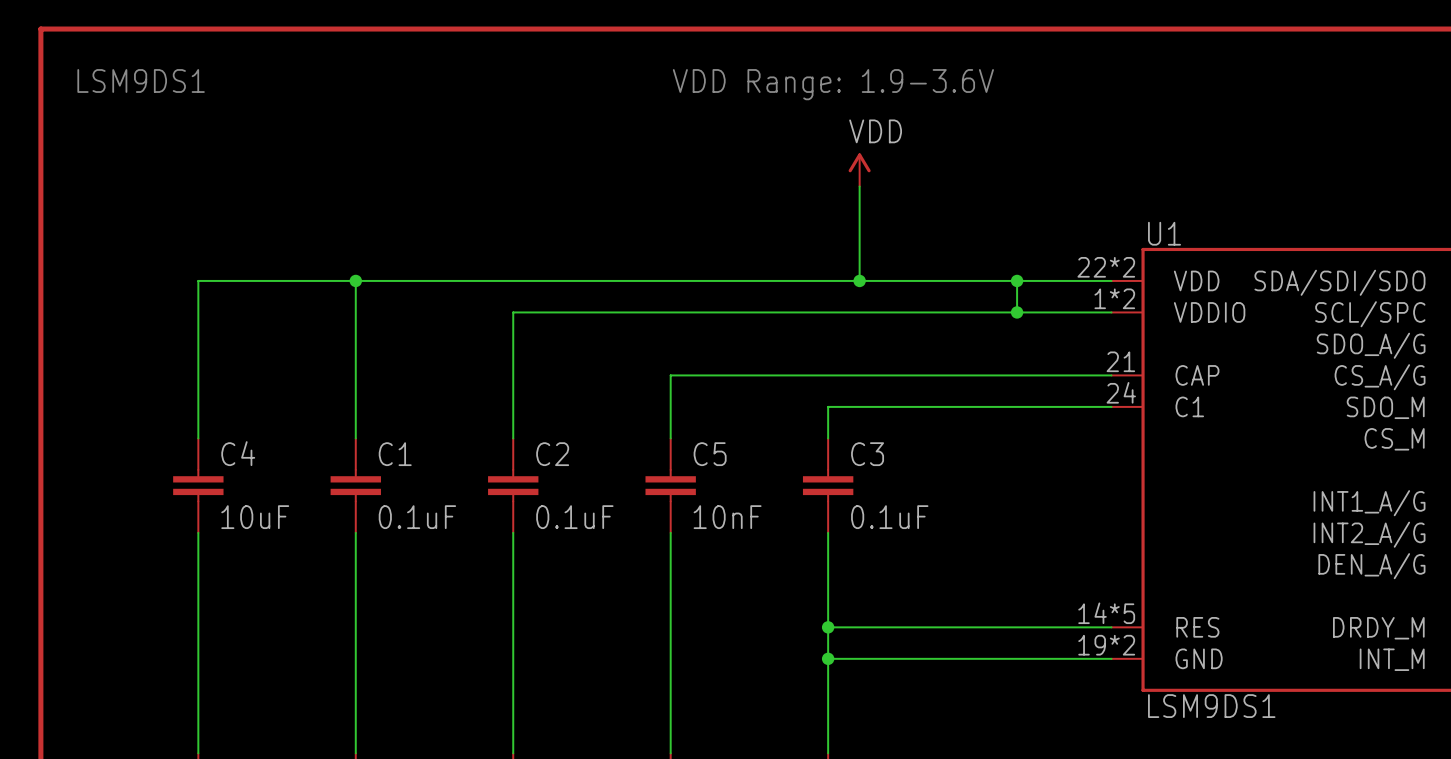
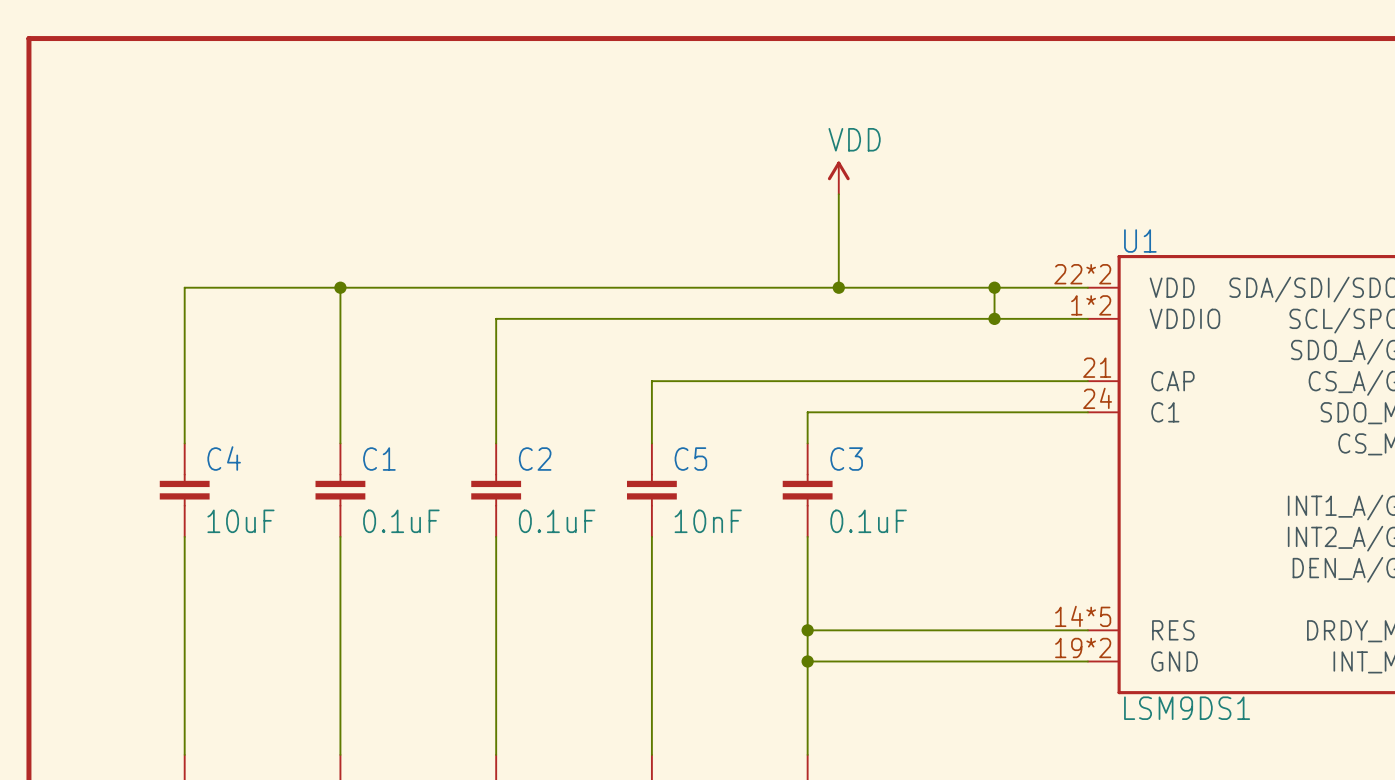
text: LSM9DS1 (141, 80) -> none
text: VDD Range: 1.9-3.6V (833, 84) -> none

